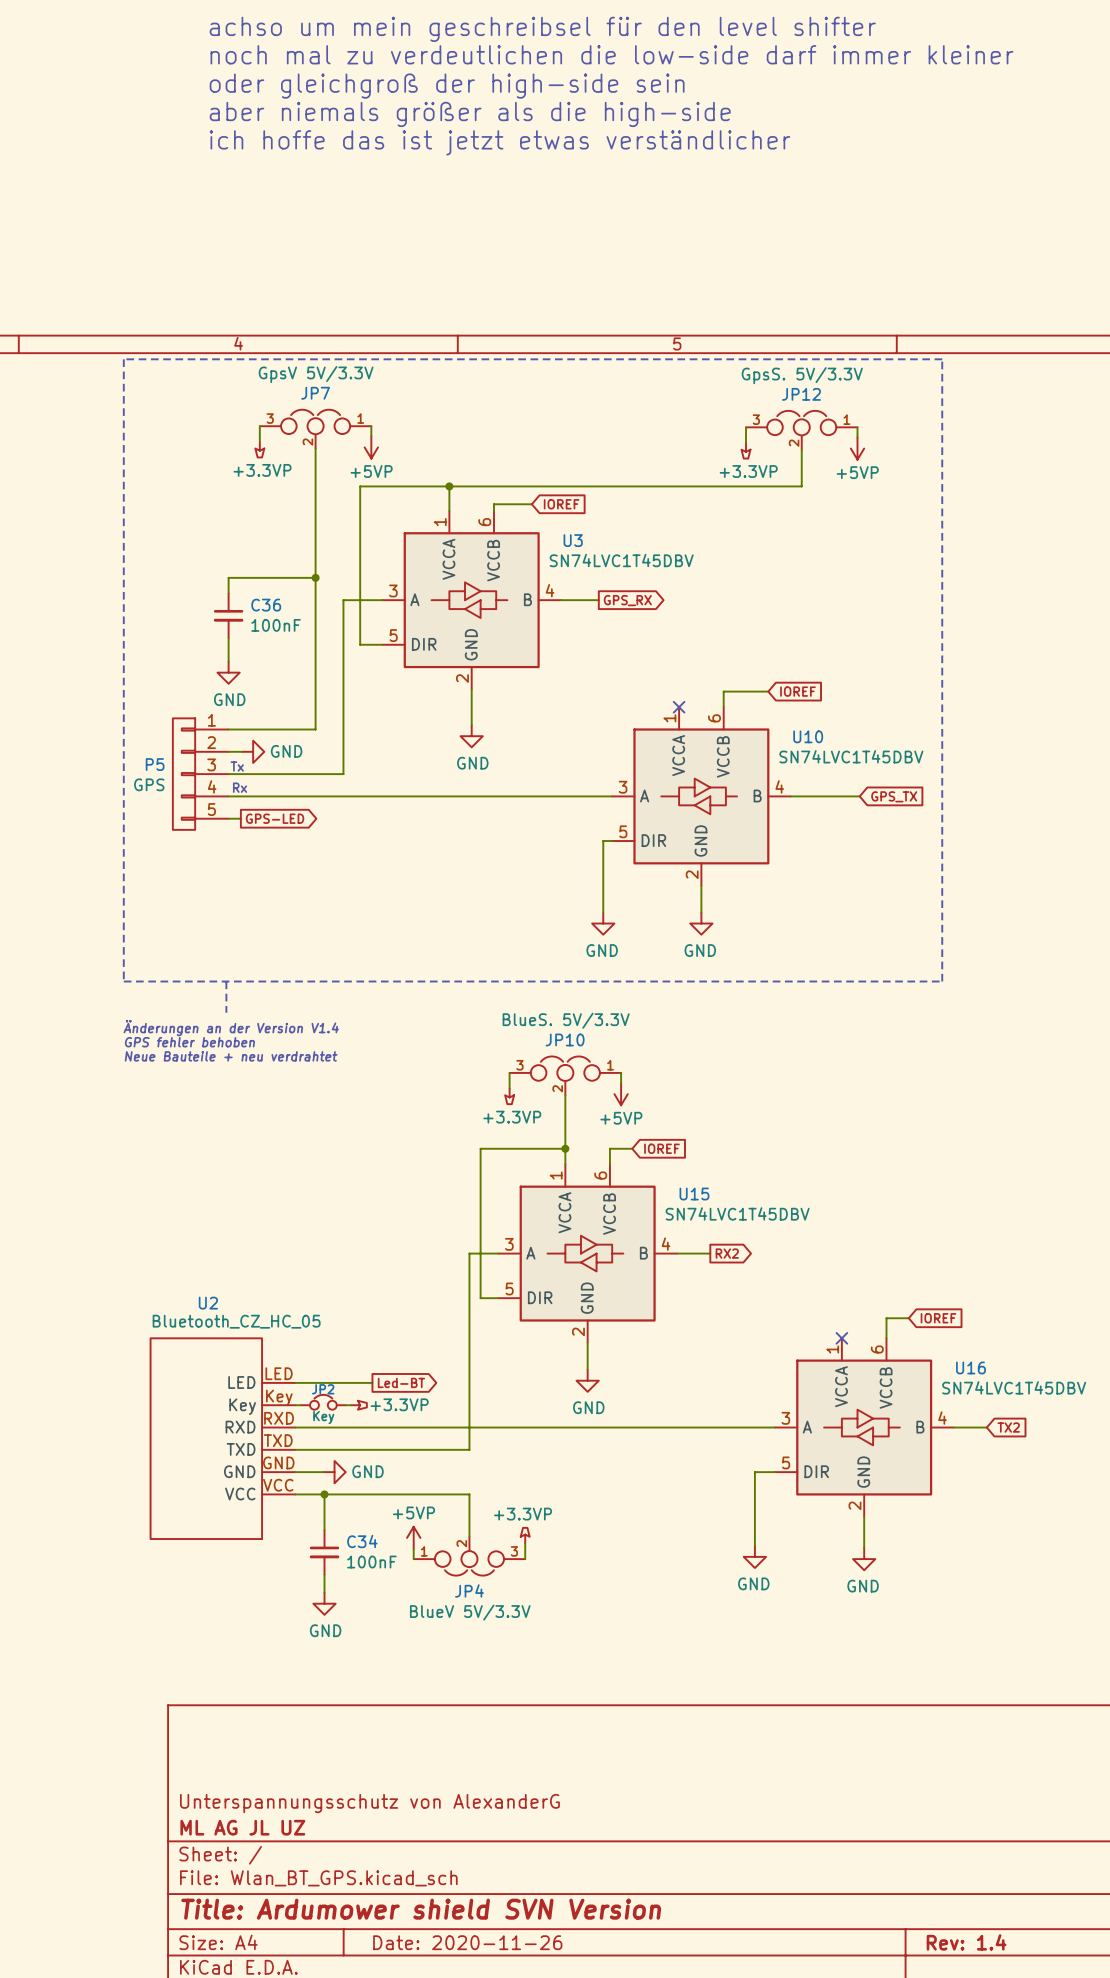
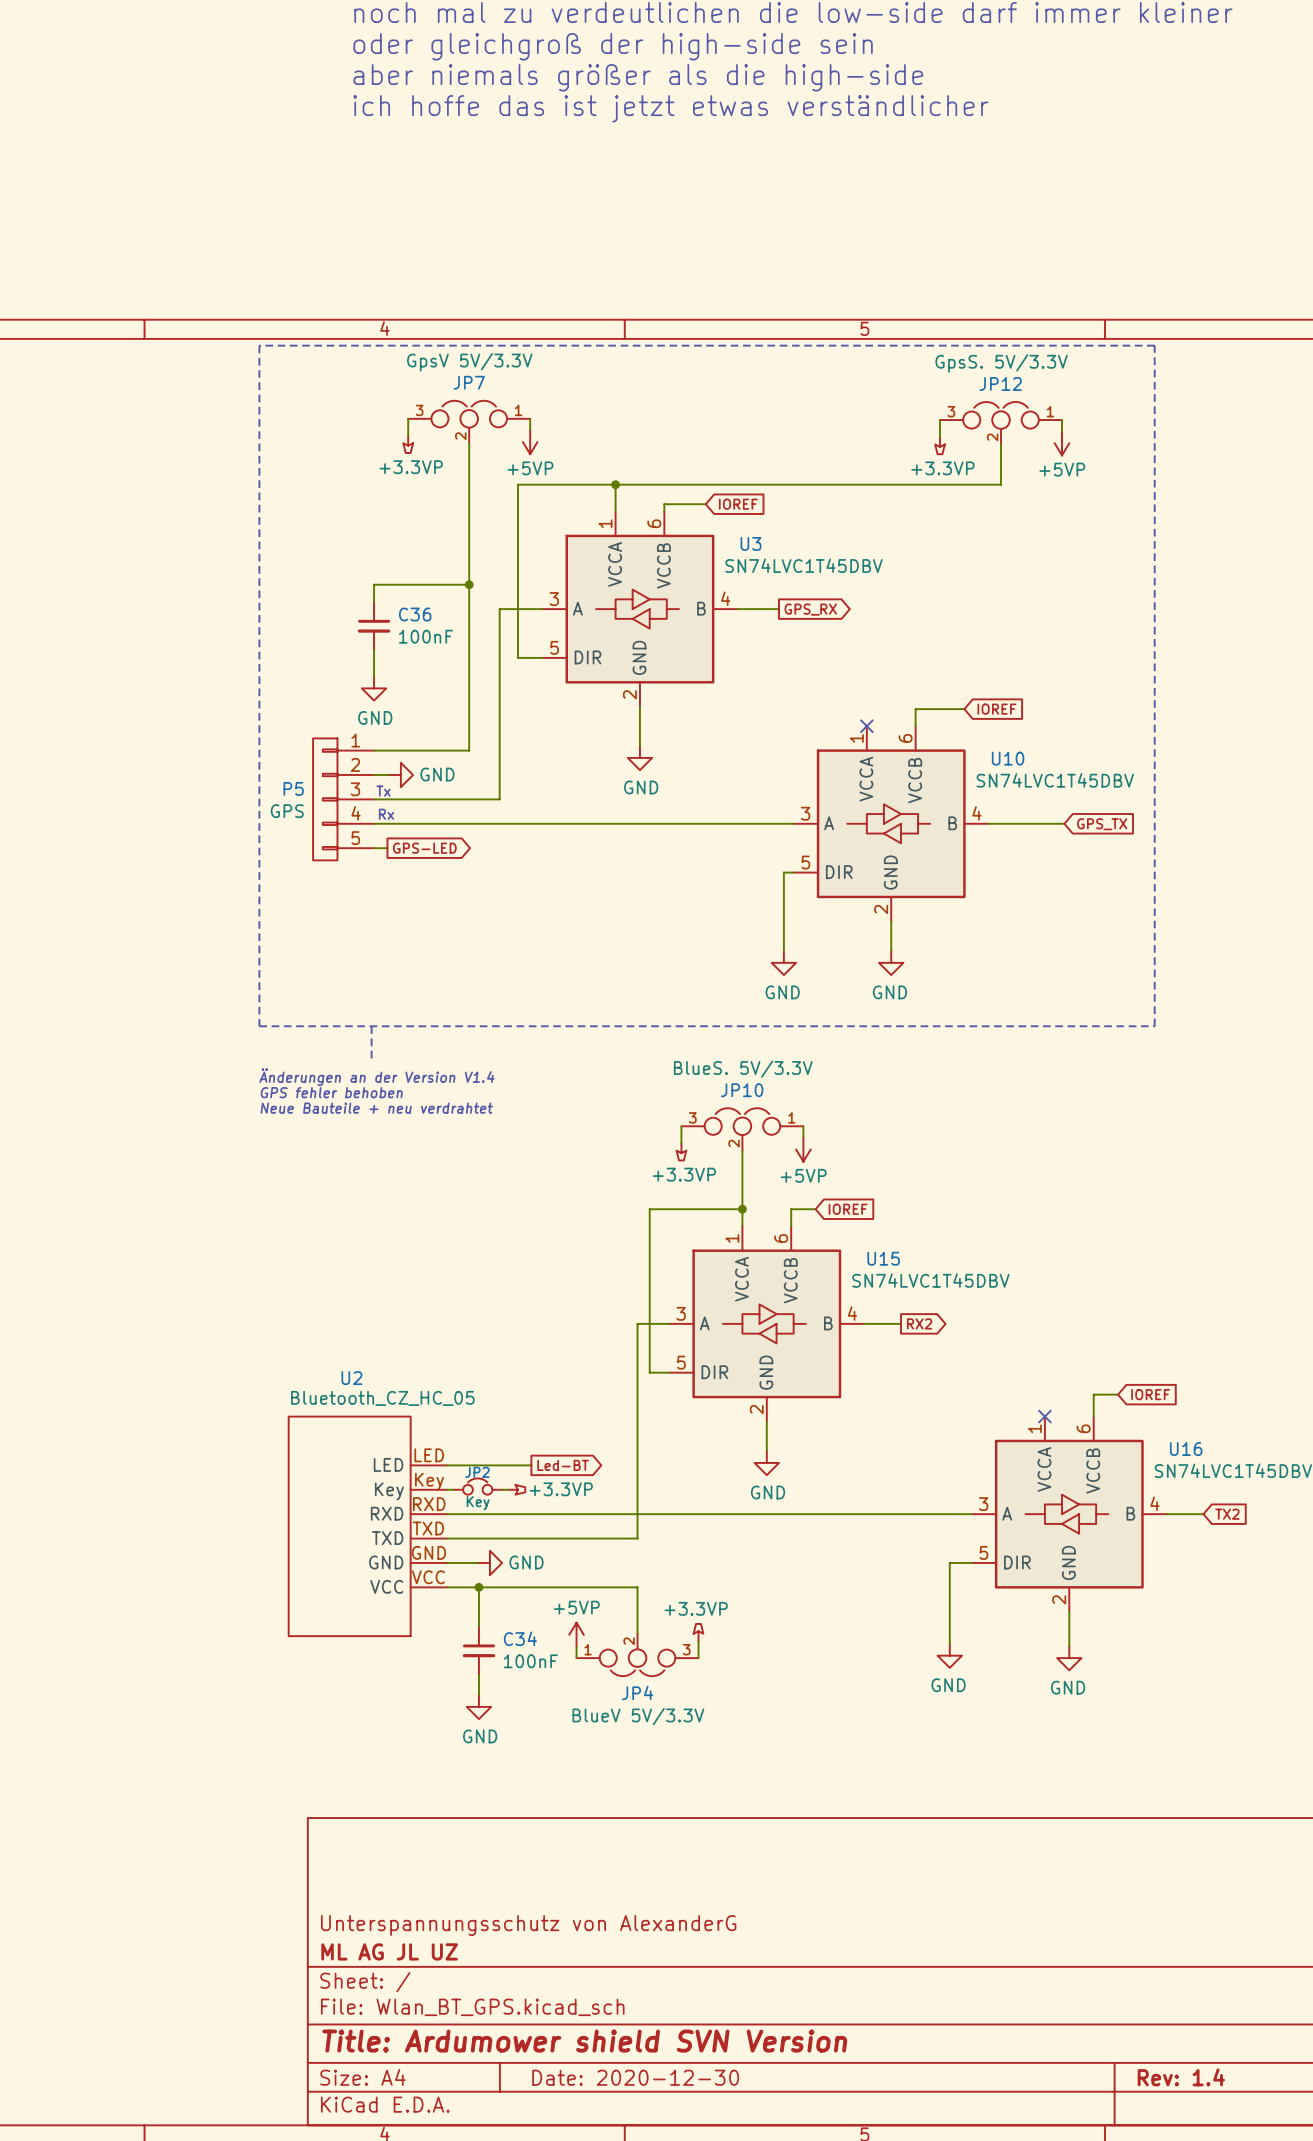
title block: Date: 2020-11-26 (467, 1942) -> Date: 2020-12-30 (635, 2077)

